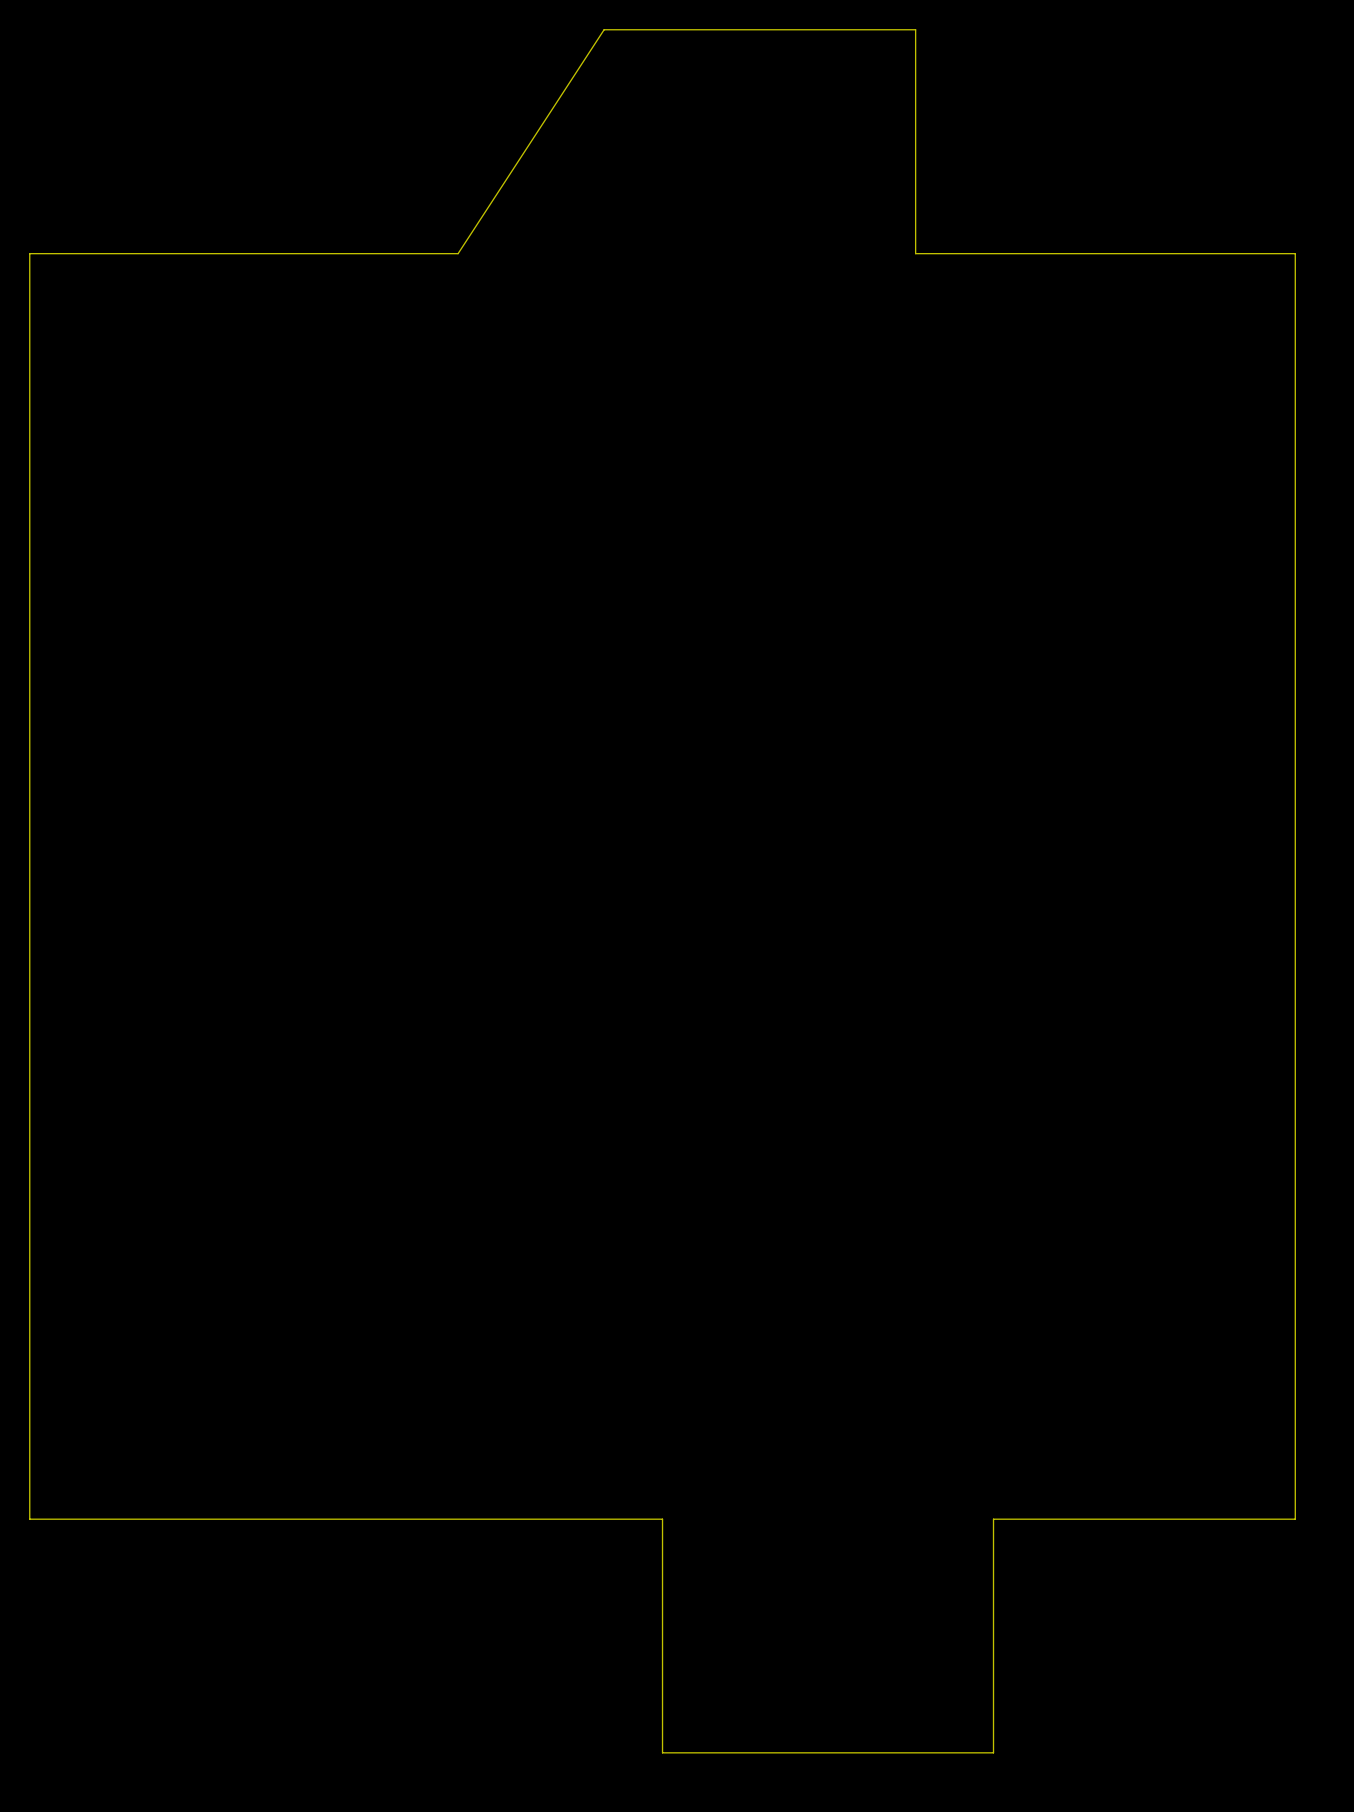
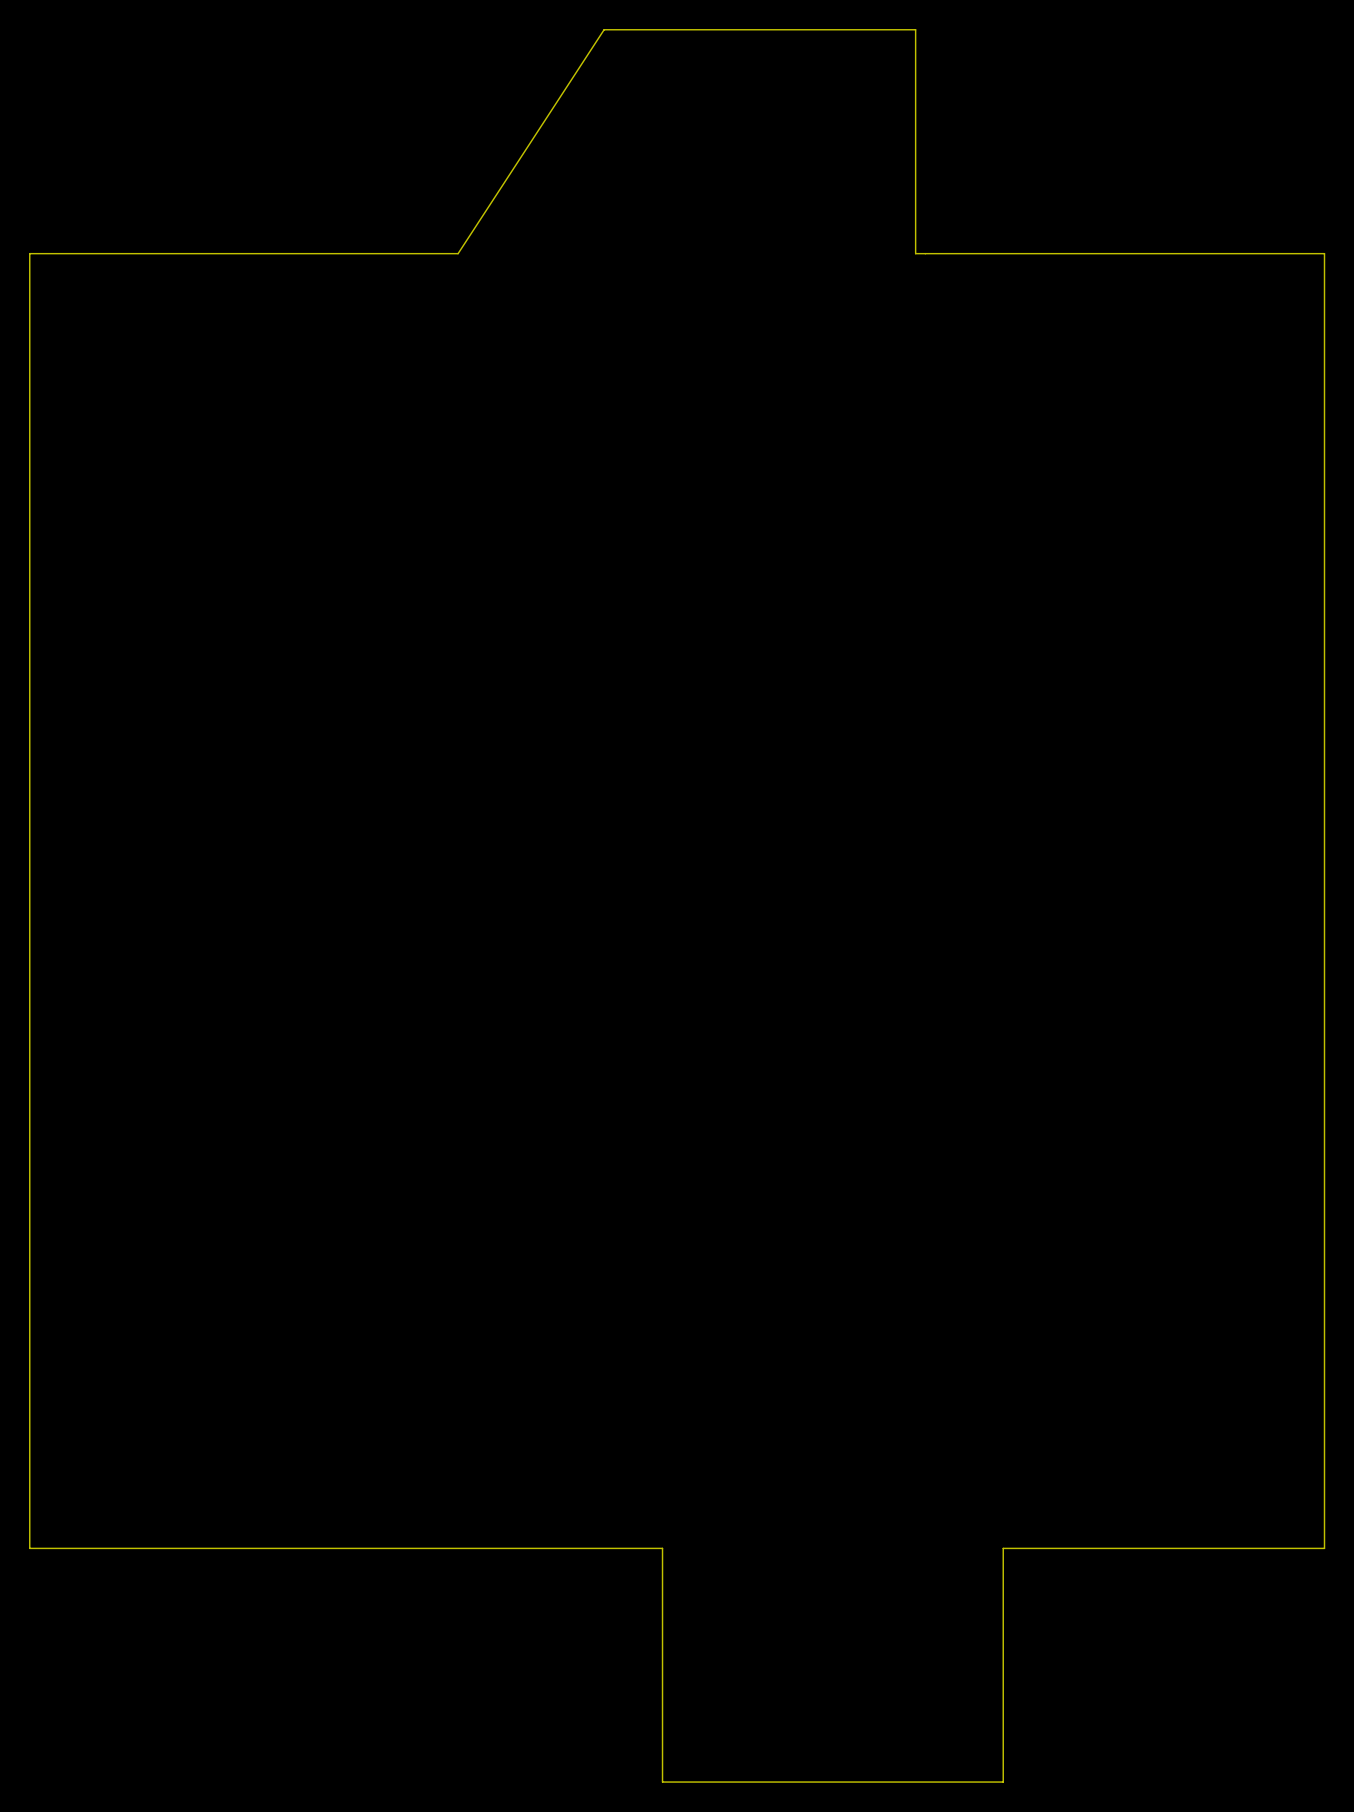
board edge: (1295, 253) (1295, 1519) (993, 1519) (993, 1752) (662, 1752) -> (1295, 253) (1324, 253) (1324, 1548) (1003, 1548) (1003, 1782) (662, 1782) (662, 1752)
board edge: (29, 1519) (662, 1519) (662, 1548) -> (29, 1519) (29, 1548) (662, 1548)

